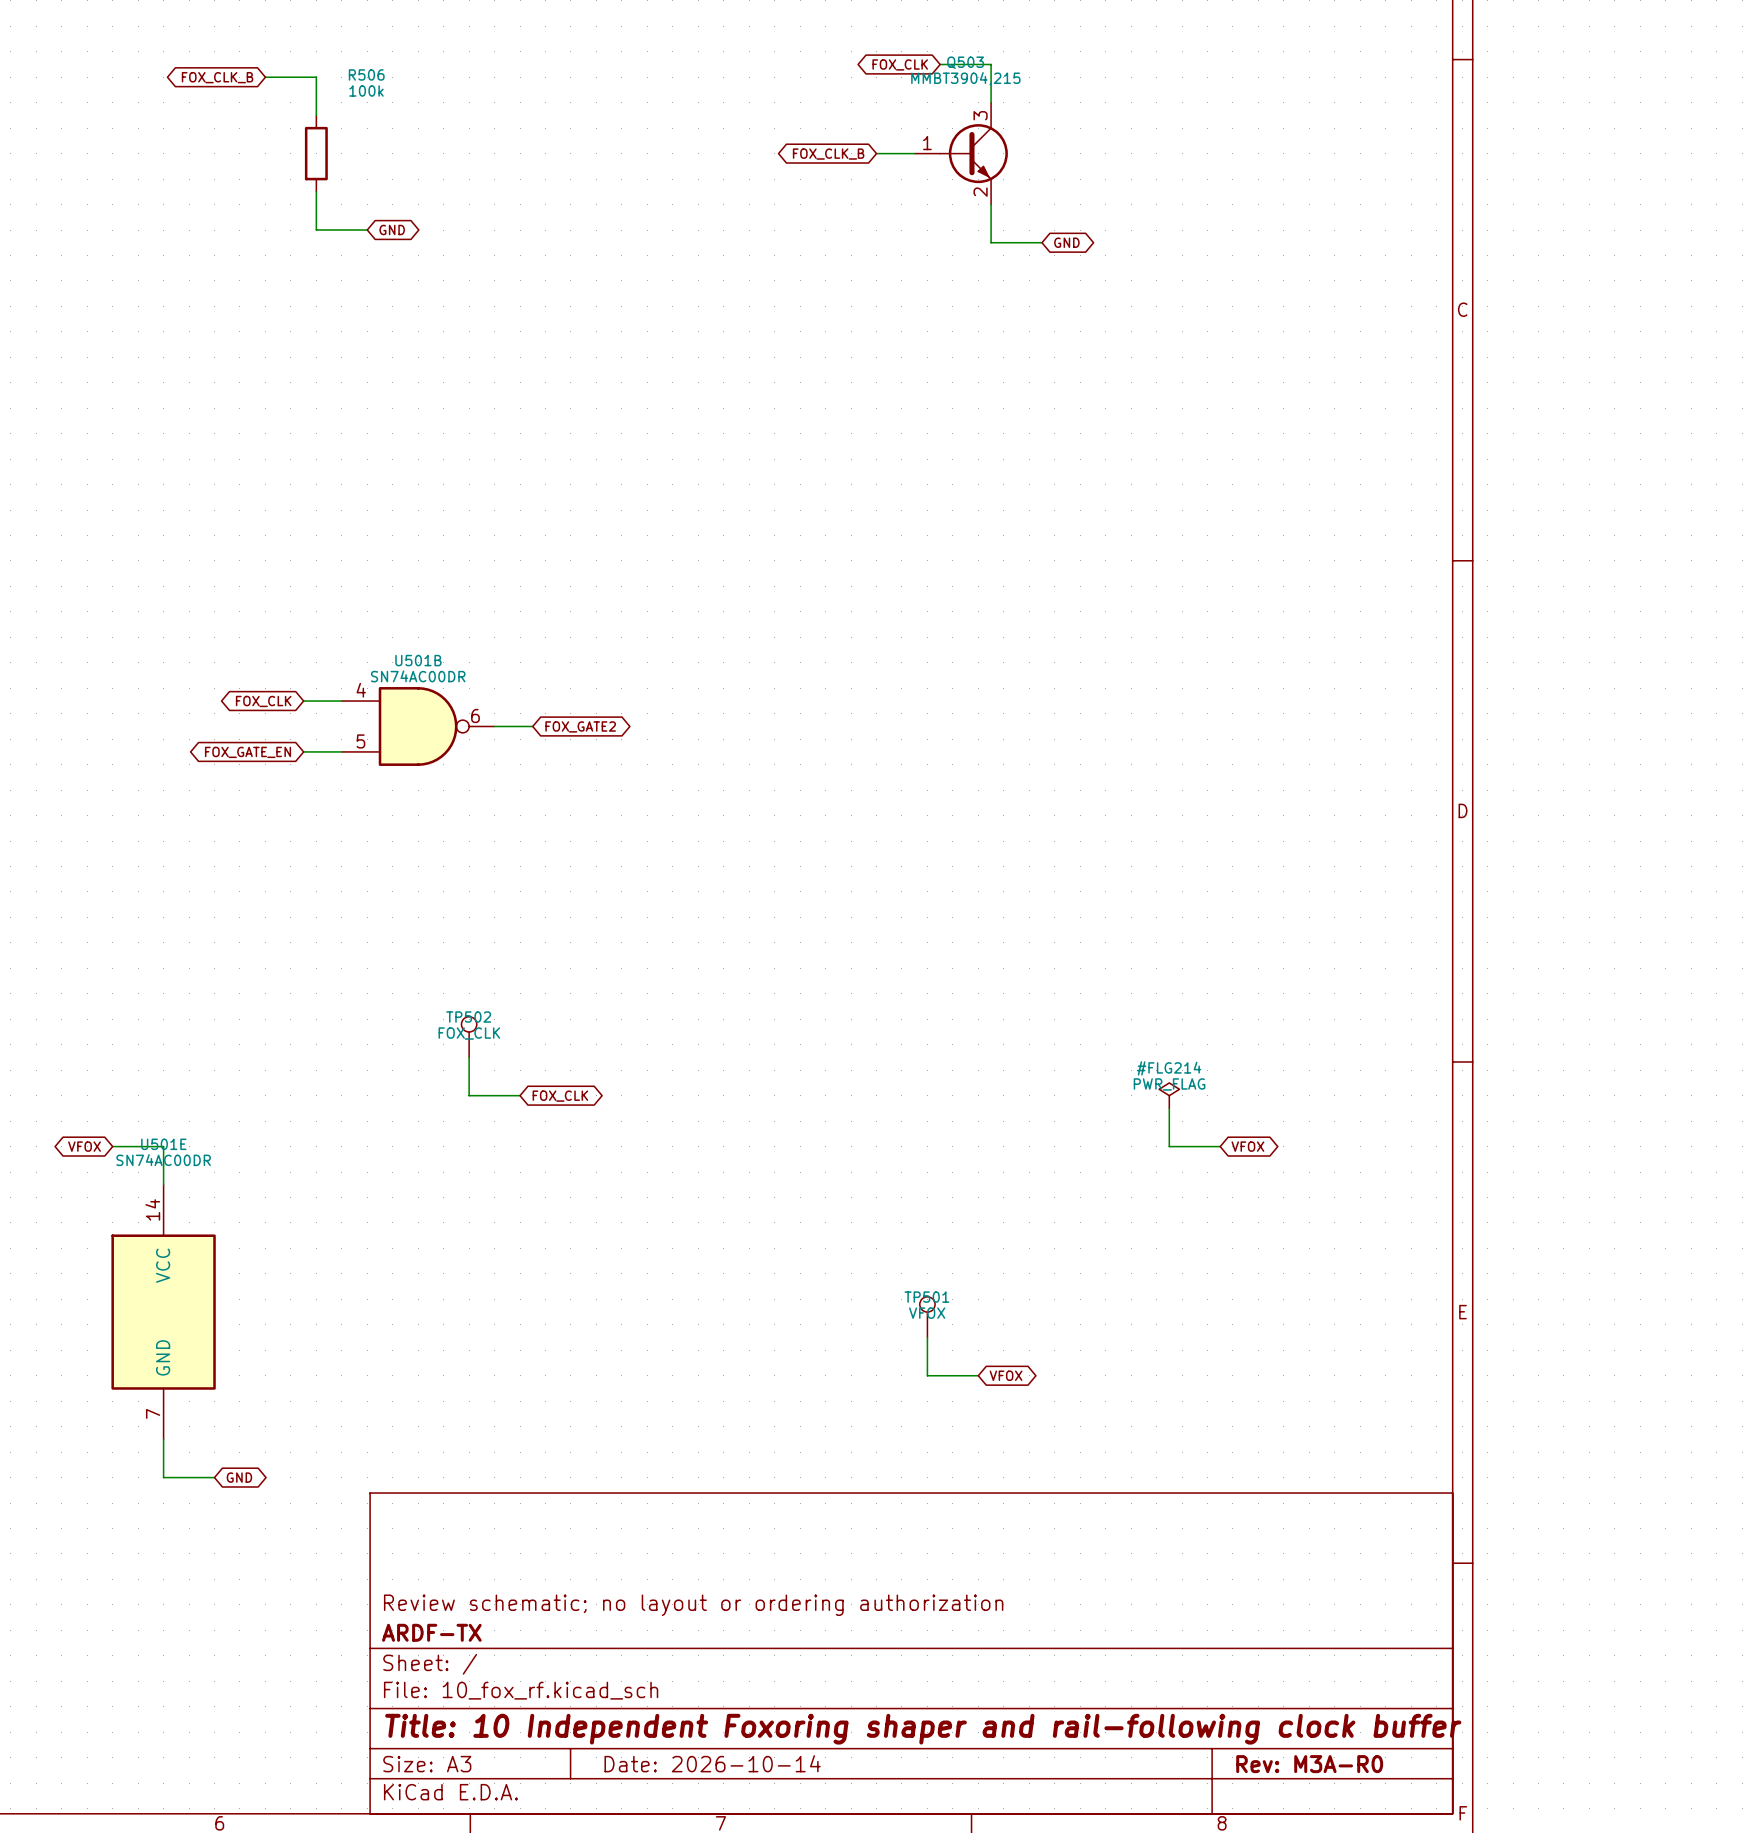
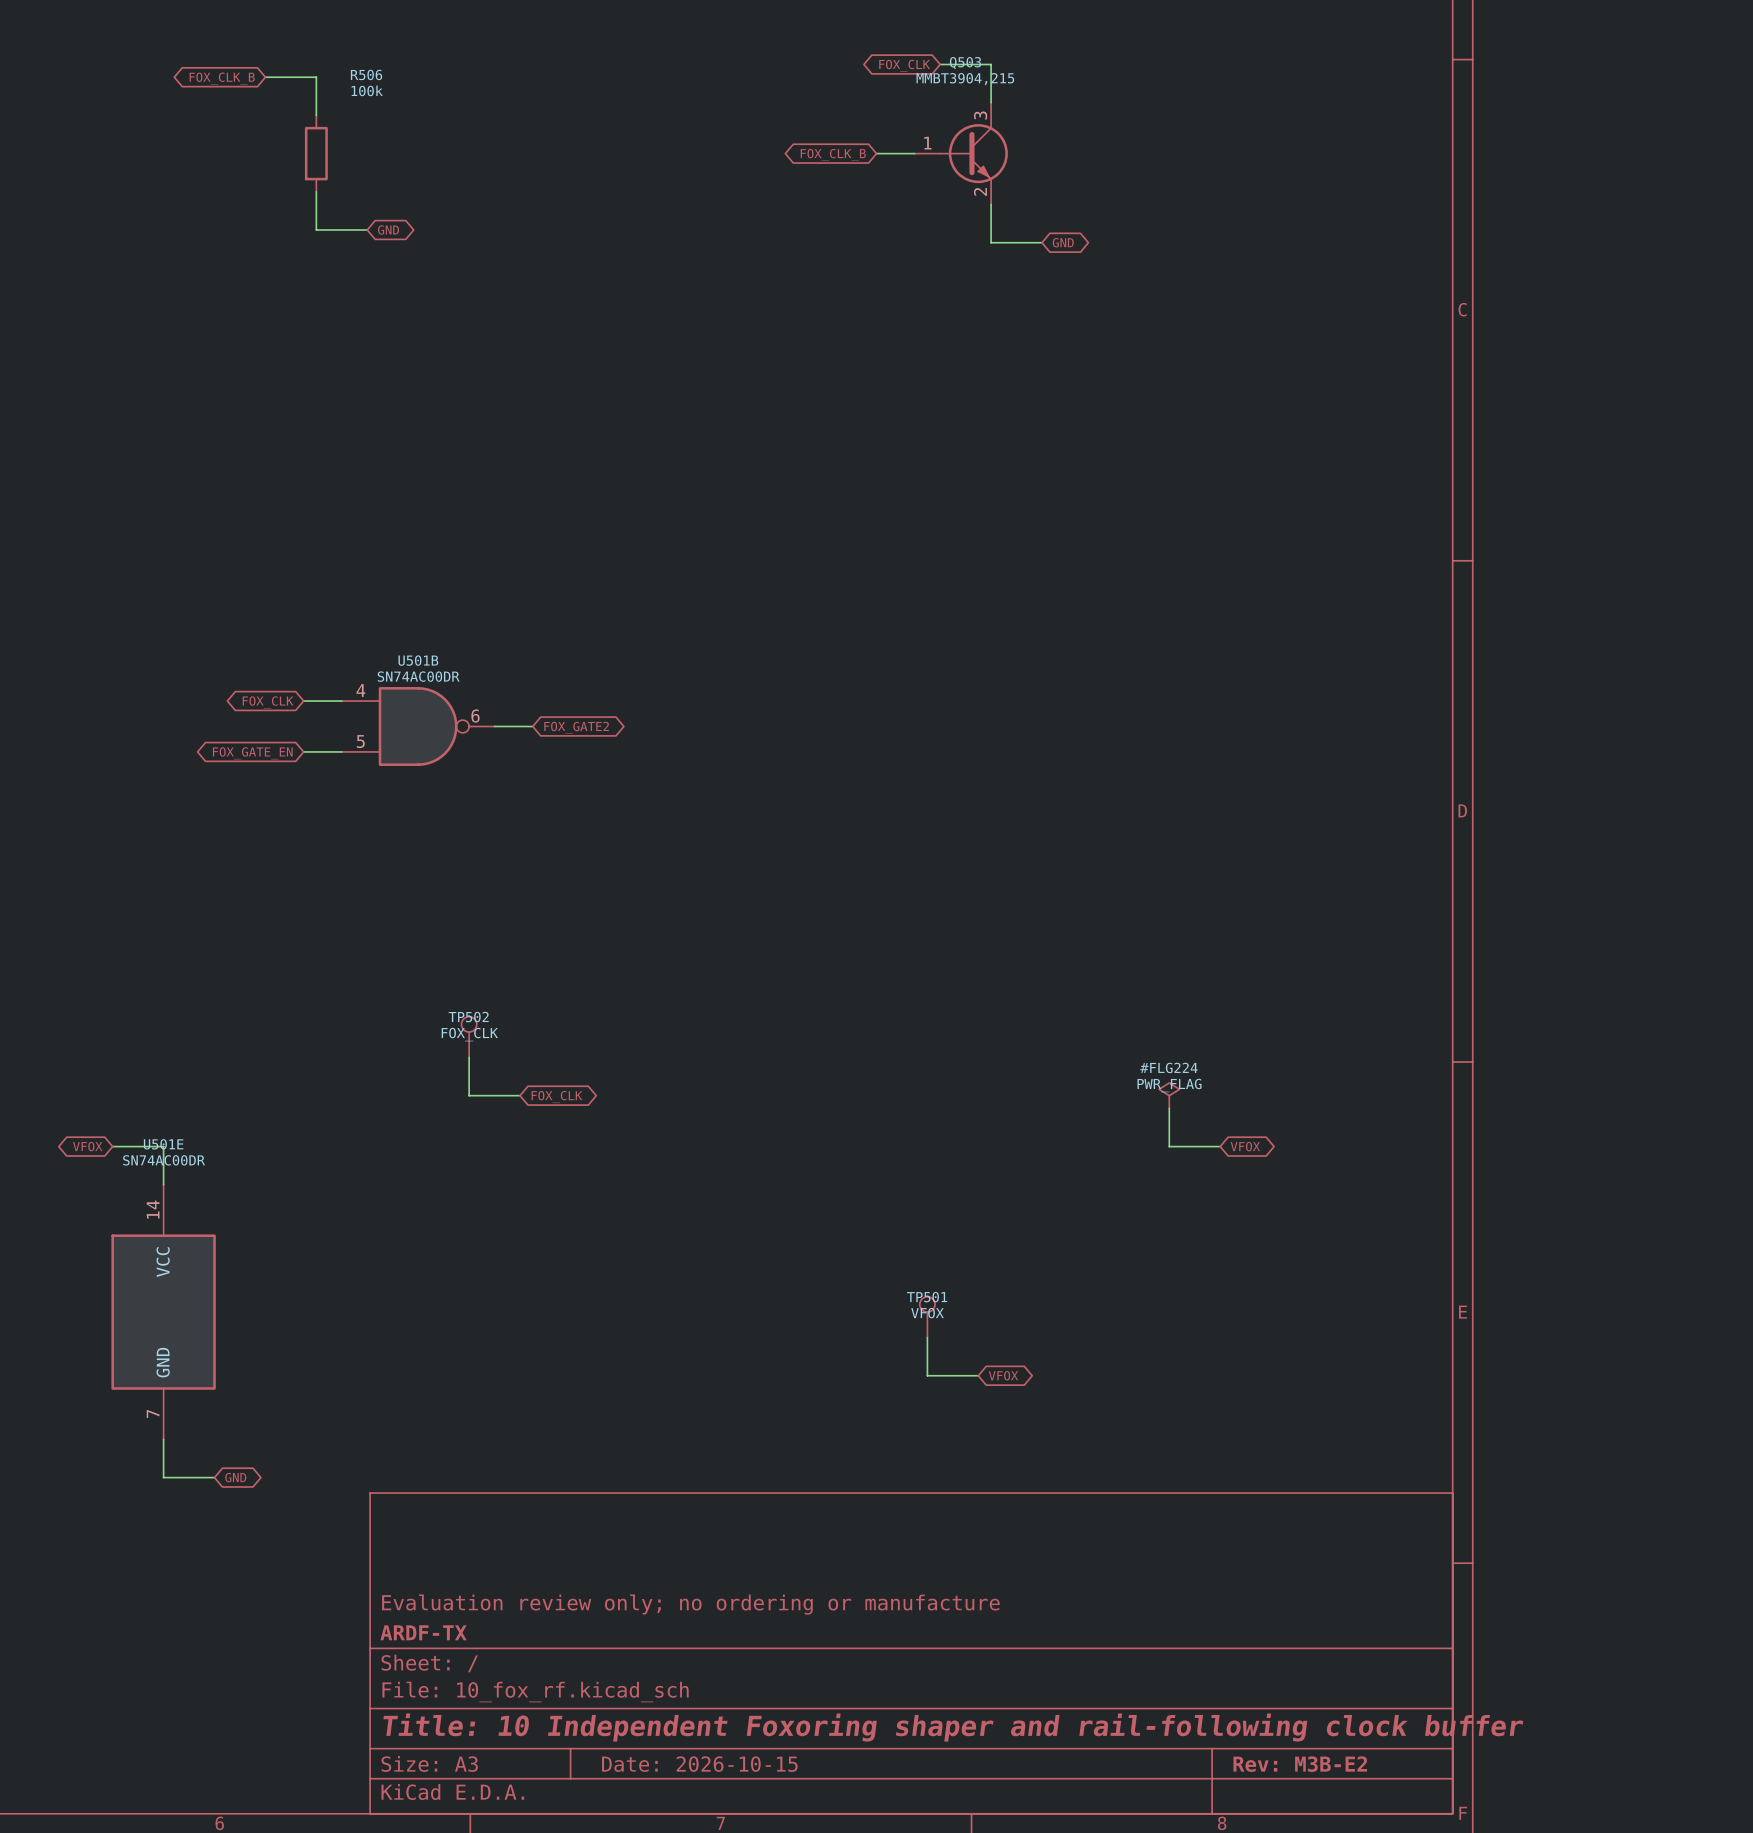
#FLG214 name: #FLG214 (1169, 1068) -> #FLG224 (1168, 1067)
title block: Review schematic; no layout or ordering authorization (693, 1605) -> Evaluation review only; no ordering or manufacture (690, 1604)
title block: Date: 2026-10-14 (712, 1763) -> Date: 2026-10-15 (699, 1764)
title block: Rev: M3A-R0 (1309, 1764) -> Rev: M3B-E2 (1300, 1764)

